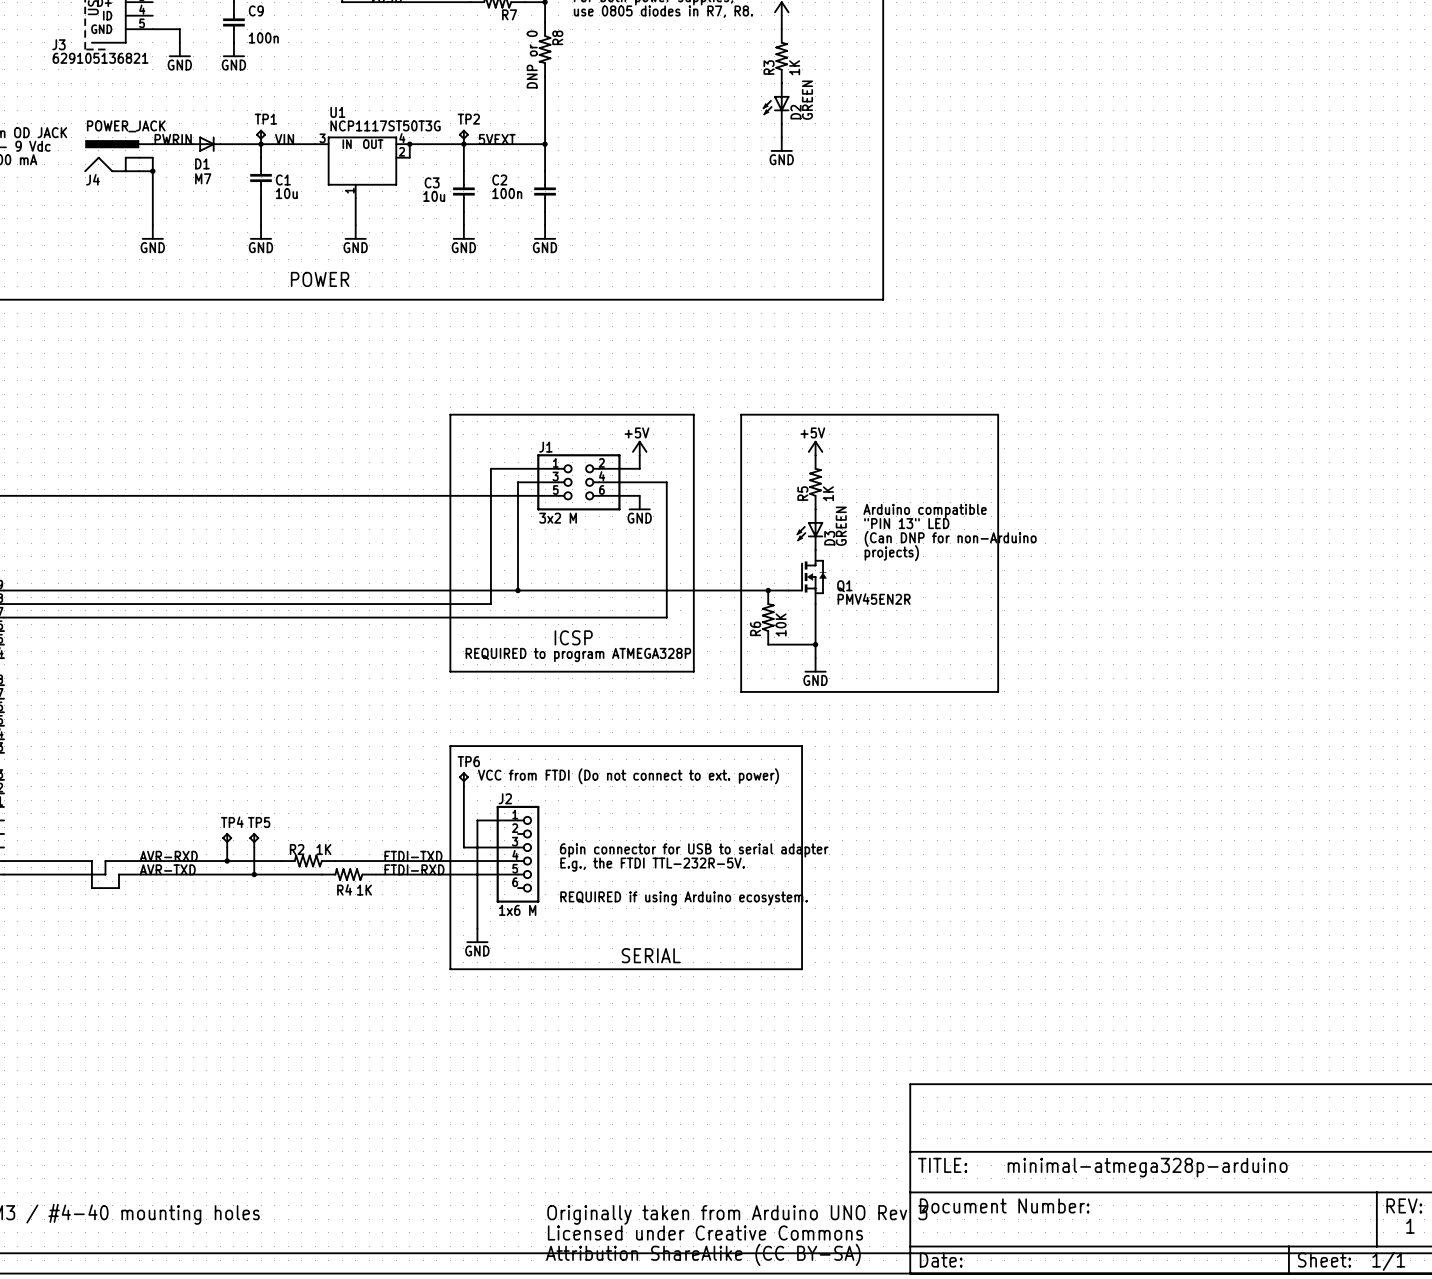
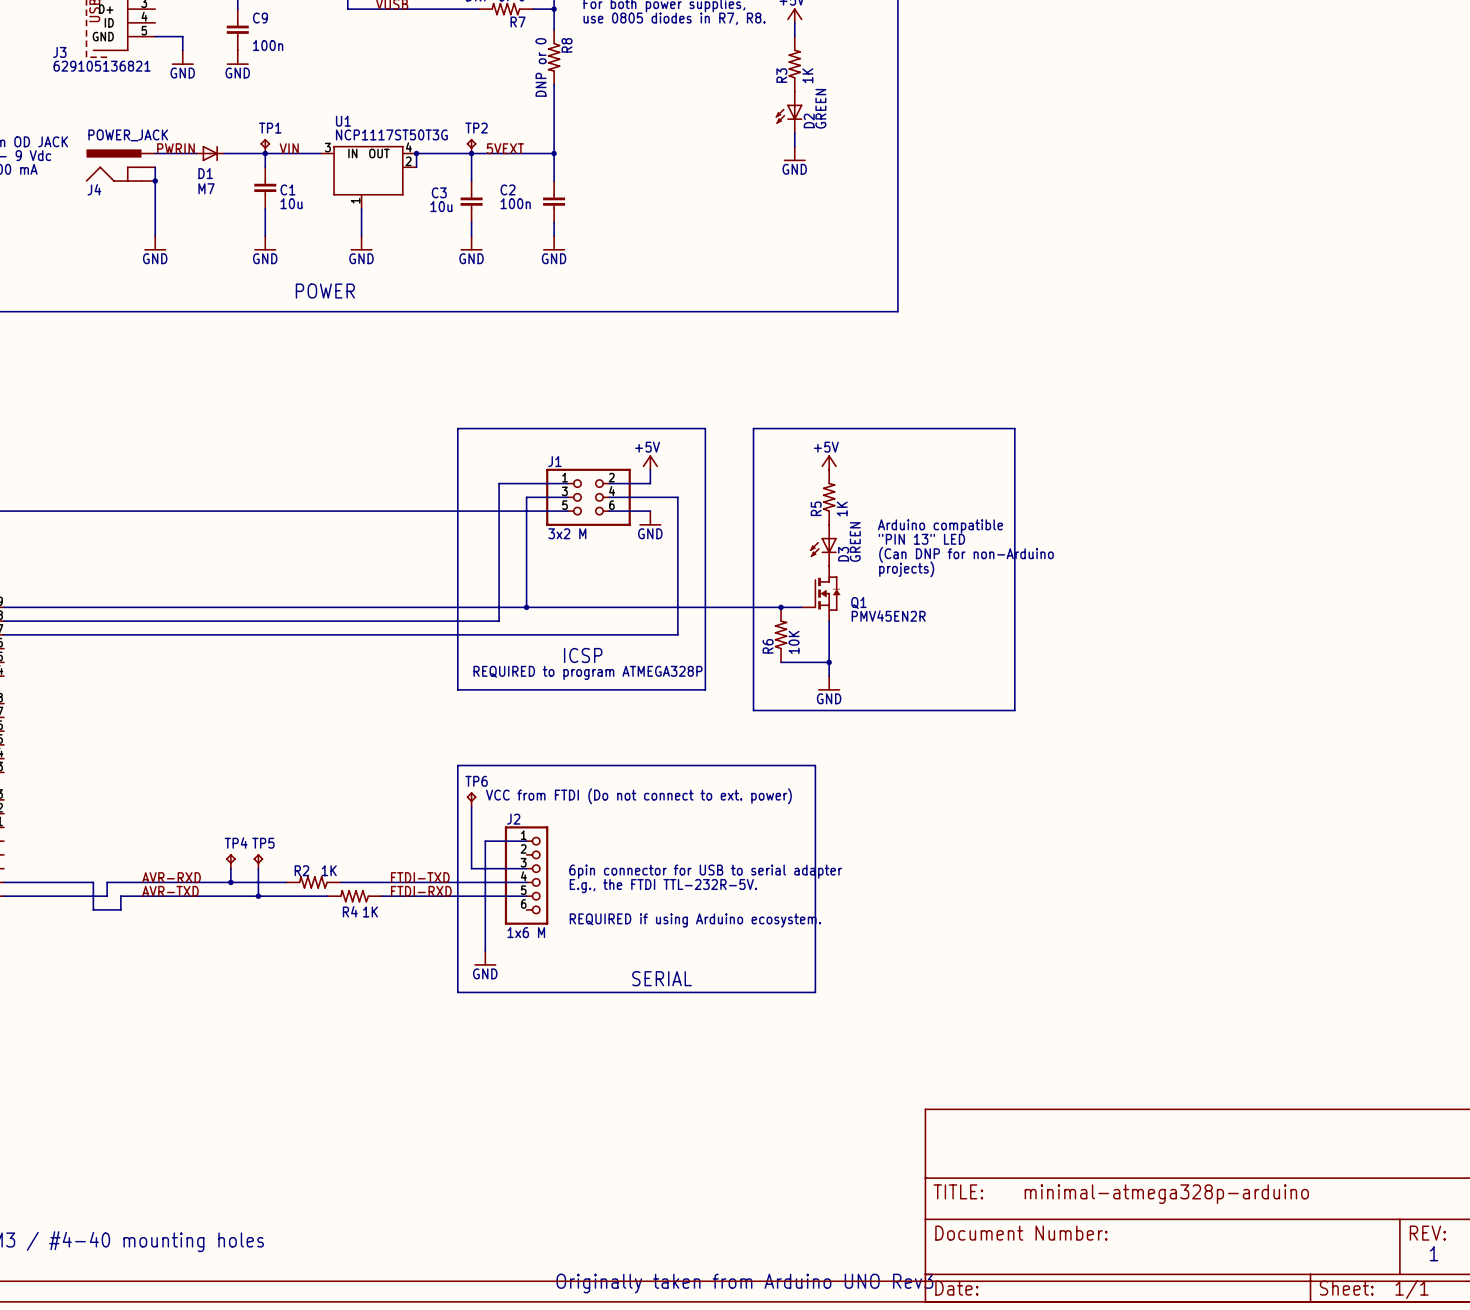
text: Originally taken from Arduino UNO Rev 3 (737, 1214) -> none
text: Licensed under Creative Commons (705, 1232) -> none
text: Attribution ShareAlike (CC BY-SA) (703, 1254) -> Originally taken from Arduino UNO Rev3 (744, 1283)

